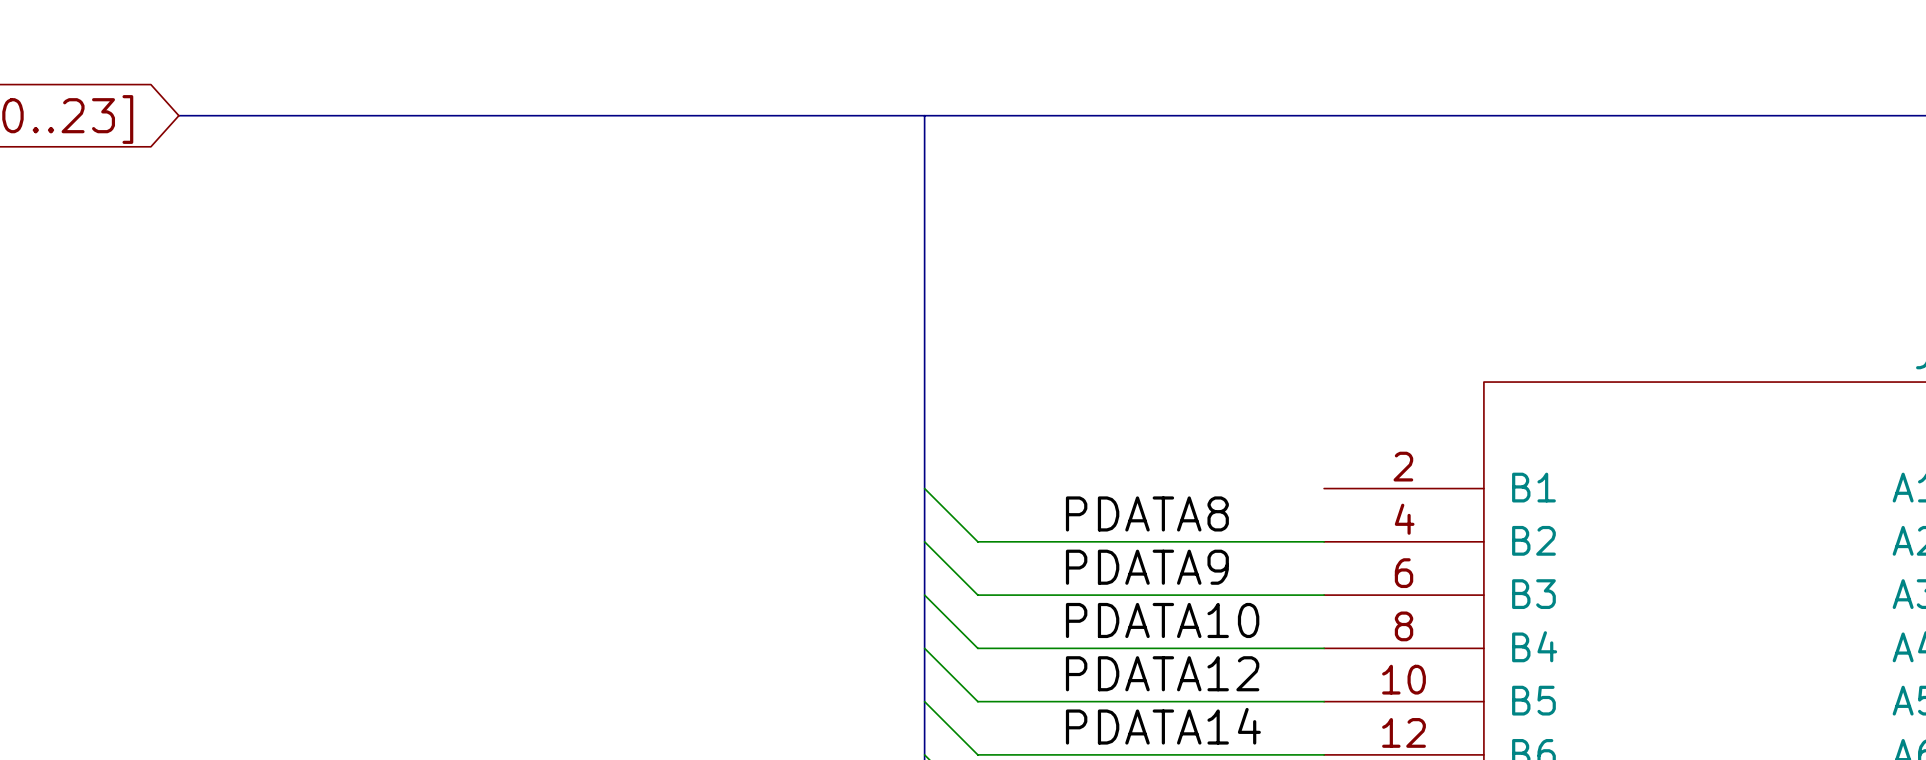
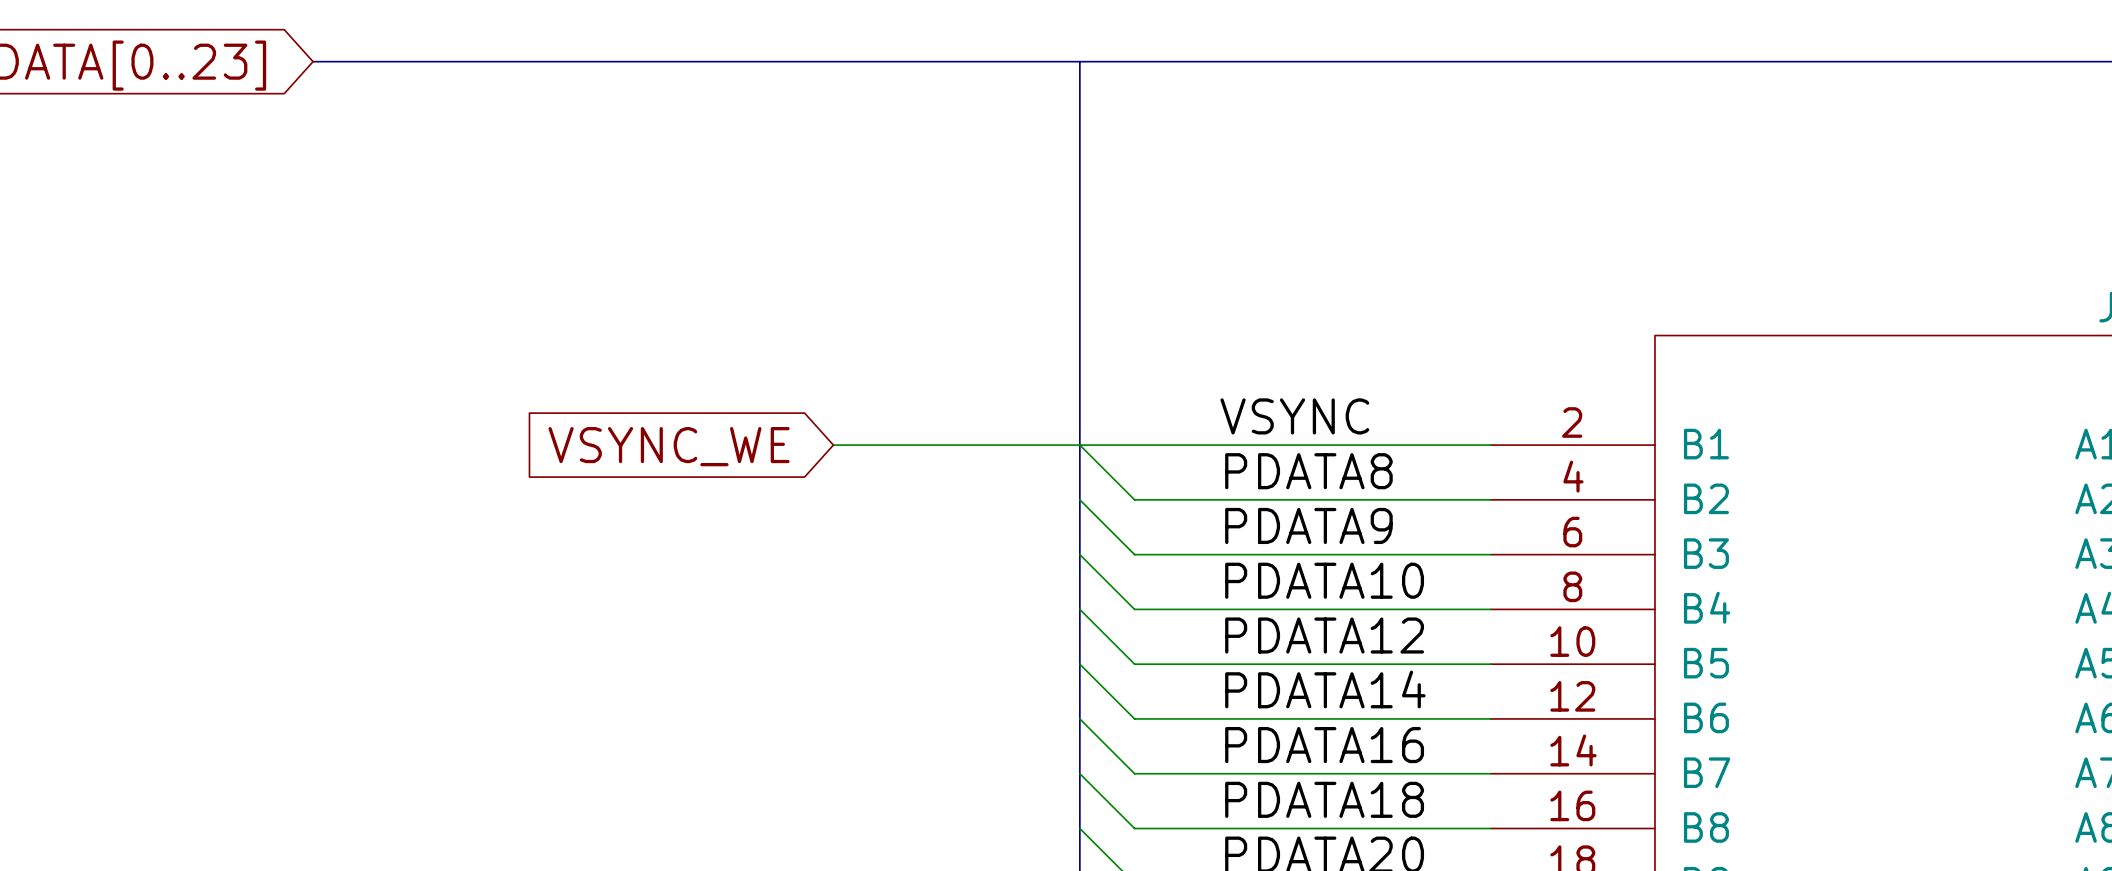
label: none -> VSYNC (1294, 416)
wire: none -> (833, 445) (1490, 445)
global label: none -> VSYNC_WE (669, 446)

